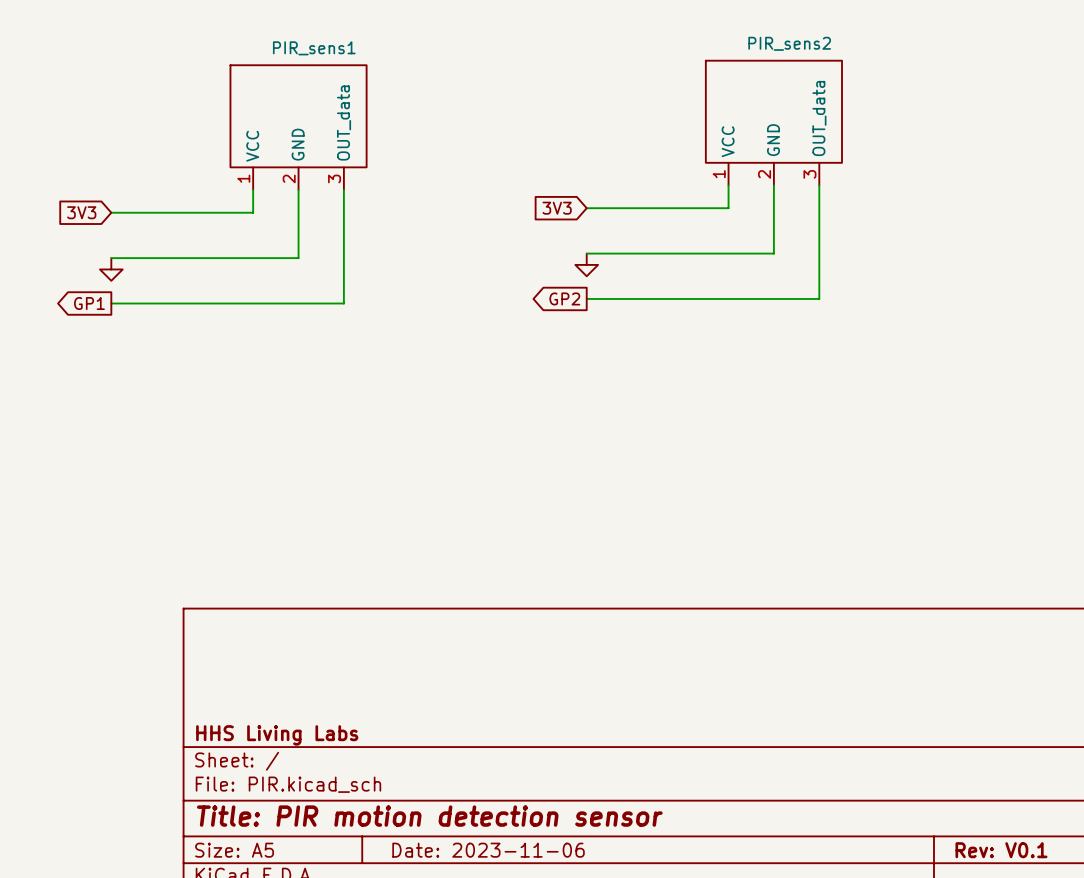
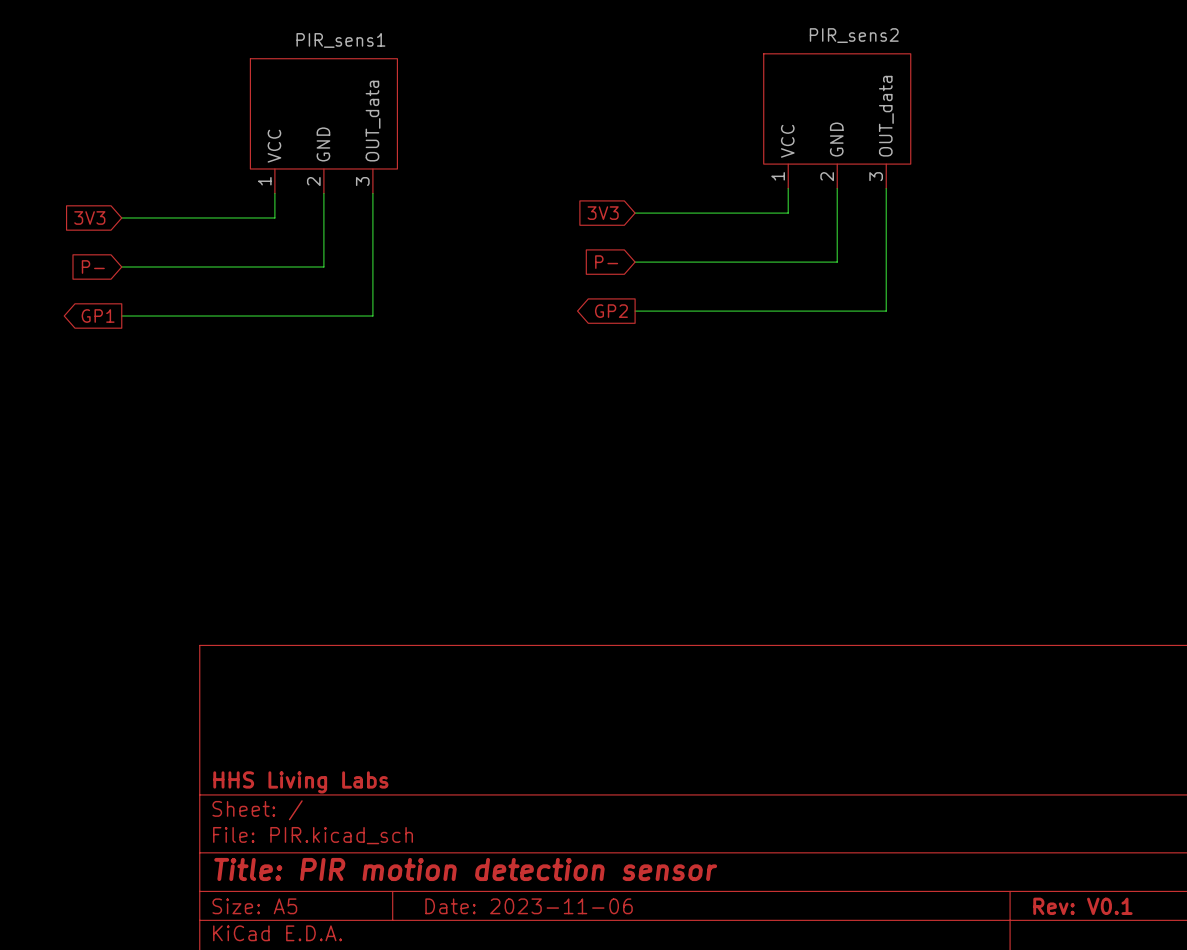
global label: none -> P- (606, 262)
global label: none -> P- (93, 266)
power symbol: (586, 264) -> none
power symbol: (111, 269) -> none

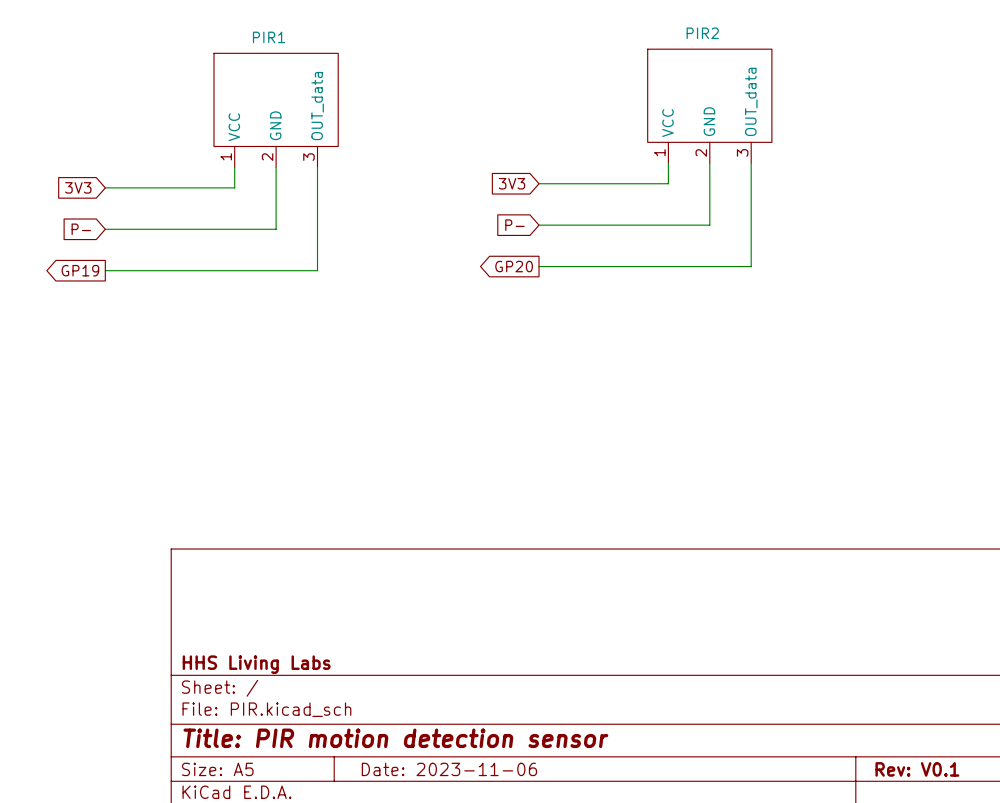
PIR_sens2 name: PIR_sens2 (854, 35) -> PIR2 (702, 33)
PIR_sens1 name: PIR_sens1 (340, 40) -> PIR1 (269, 37)
global label: GP2 (611, 311) -> GP20 (514, 266)
global label: GP1 (98, 316) -> GP19 (80, 270)

